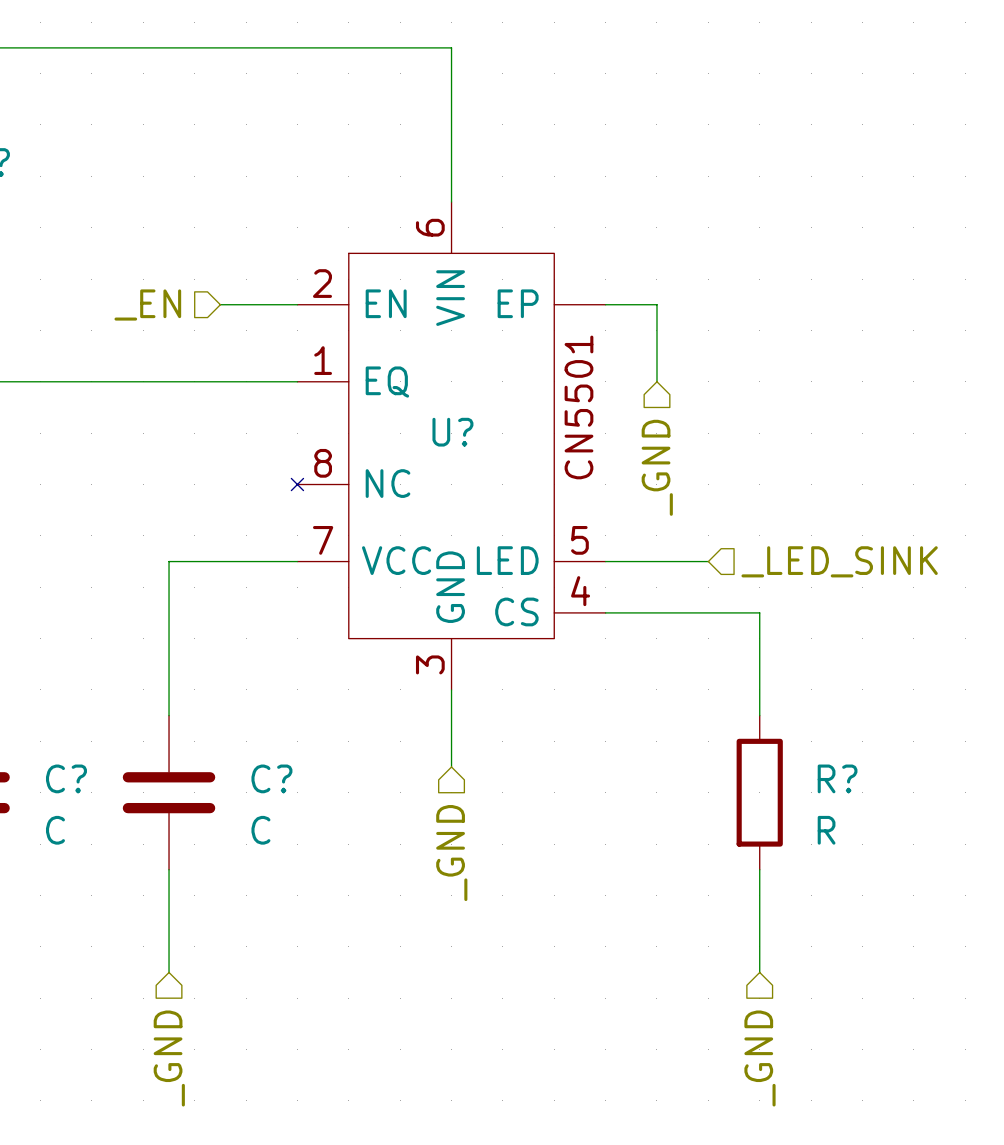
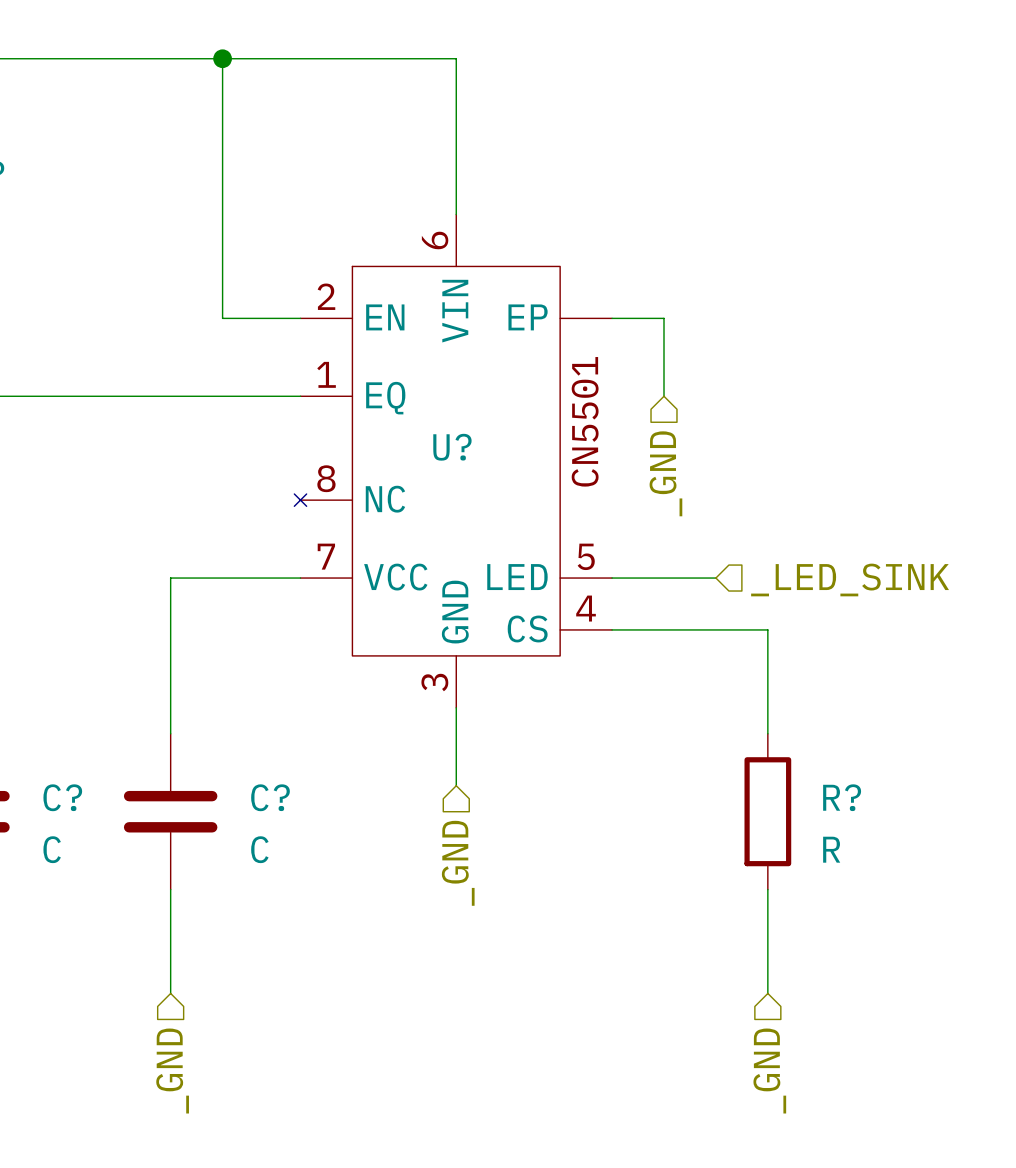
wire: none -> (222, 58) (222, 318)
junction: none -> (222, 58)
hierarchical label: _EN (147, 304) -> none

